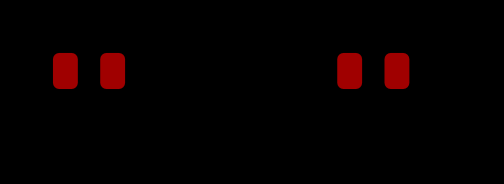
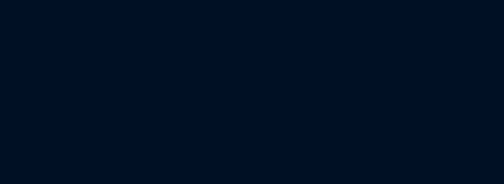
part: (89, 70) -> none
part: (373, 70) -> none

